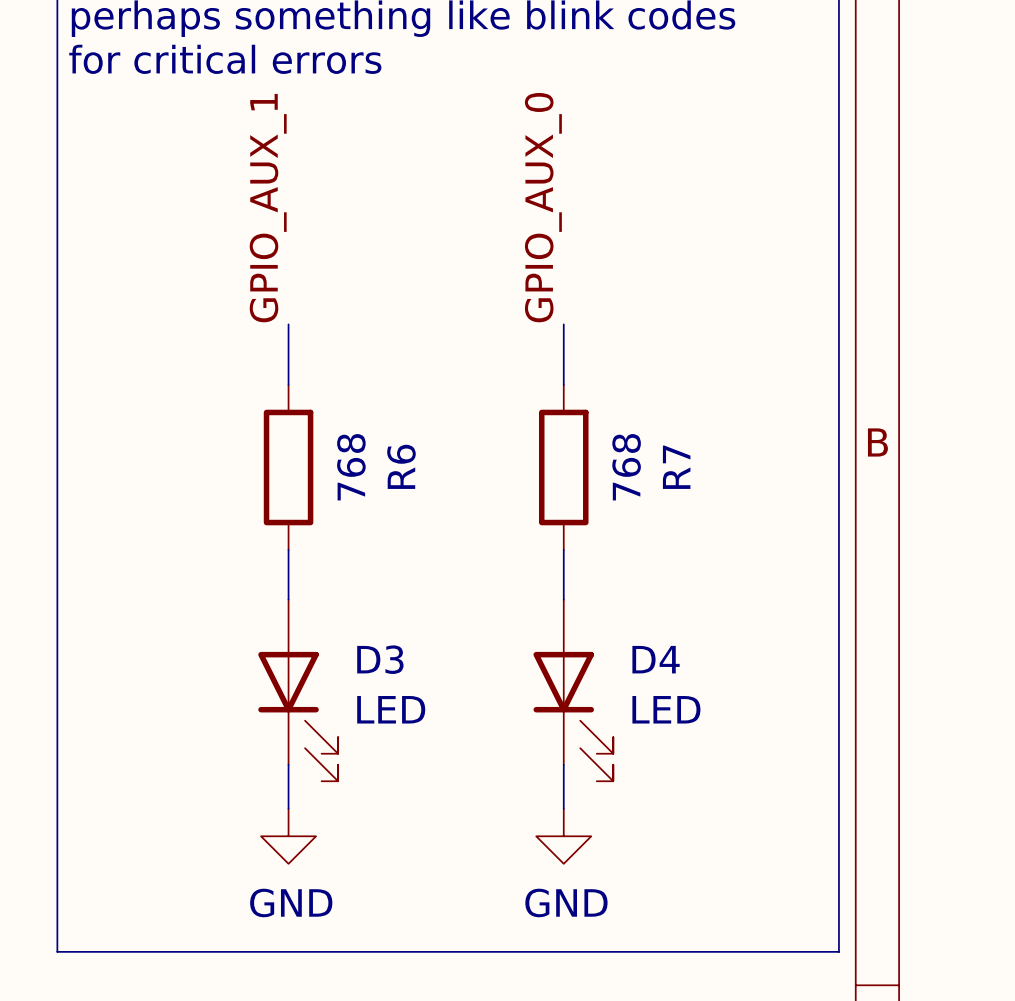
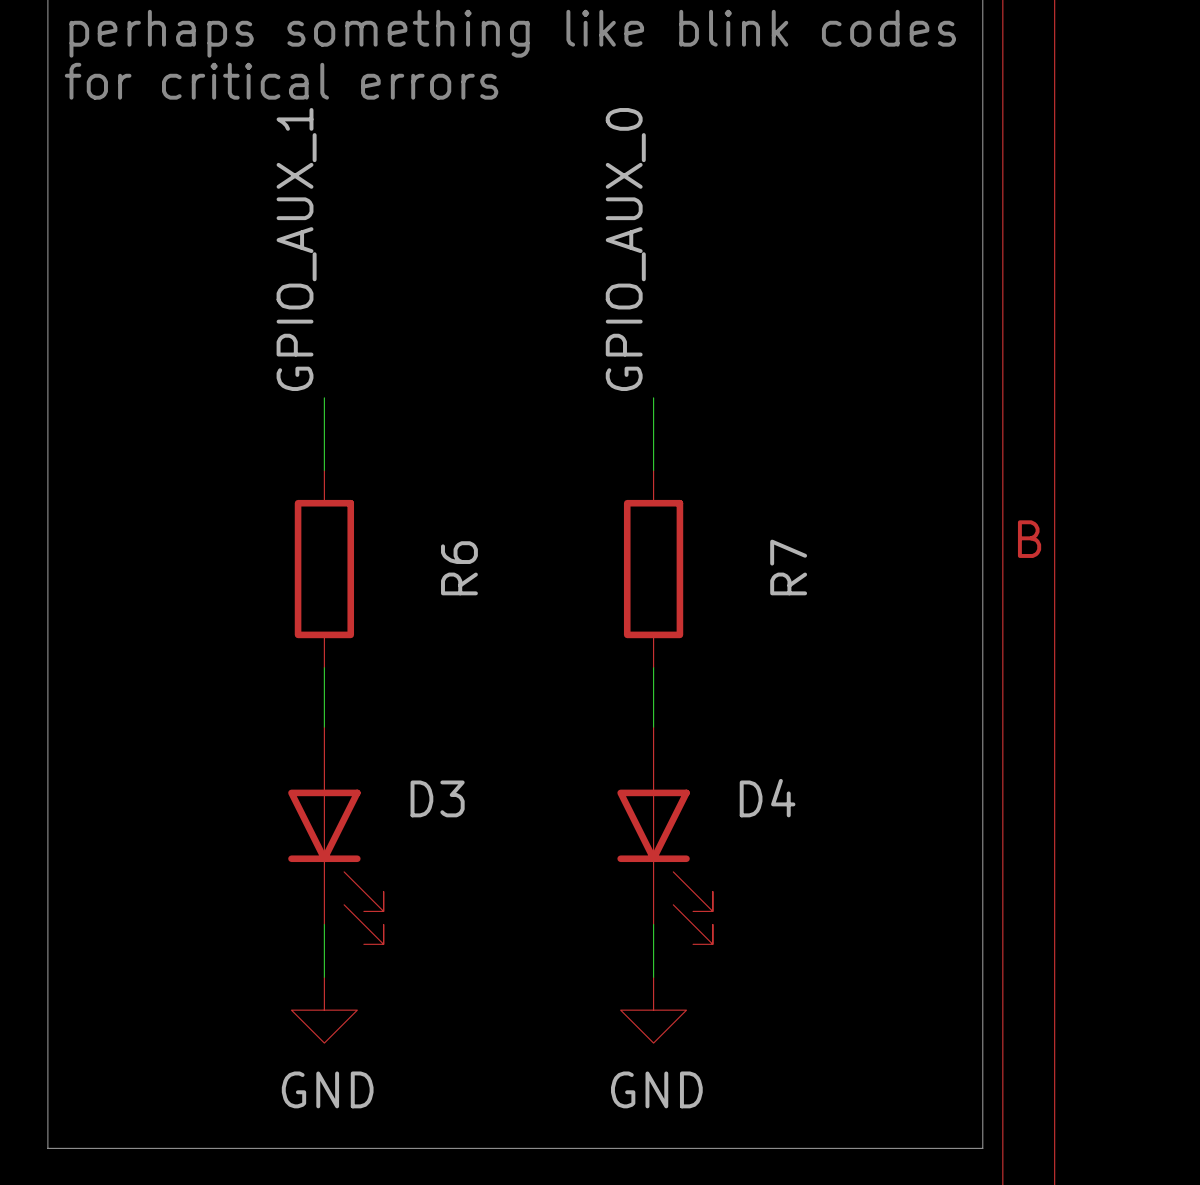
R6 value: 768 (351, 467) -> none
R7 value: 768 (626, 467) -> none
D3 value: LED (391, 709) -> none
D4 value: LED (666, 709) -> none

